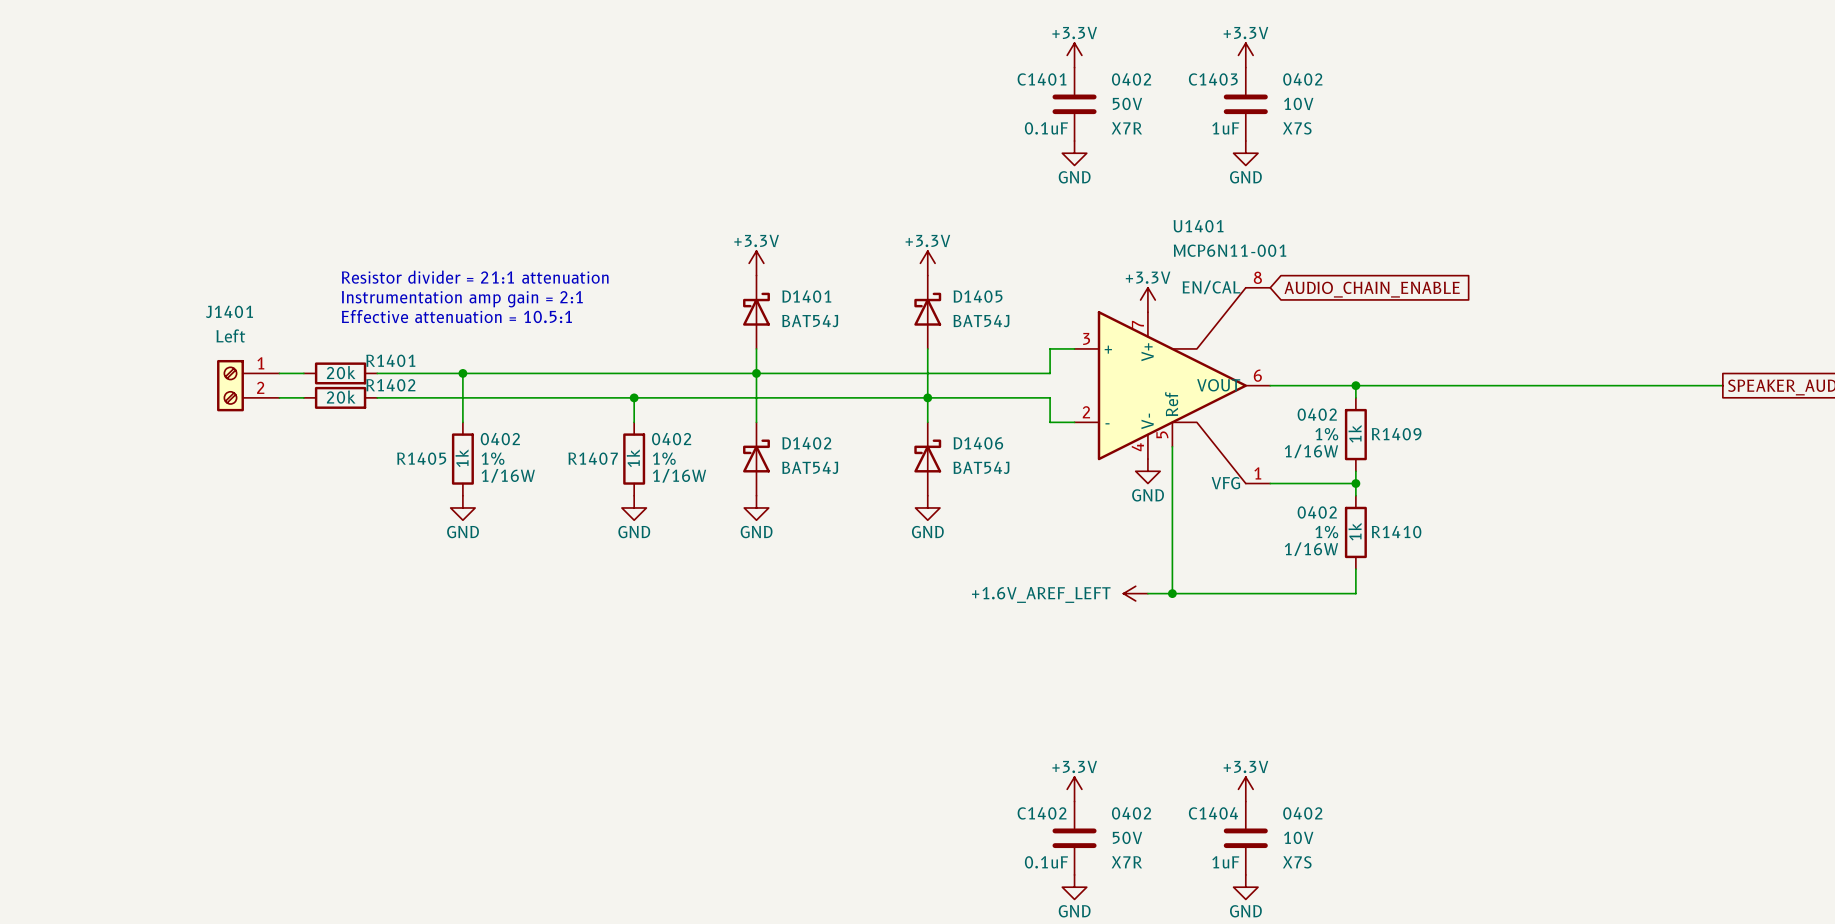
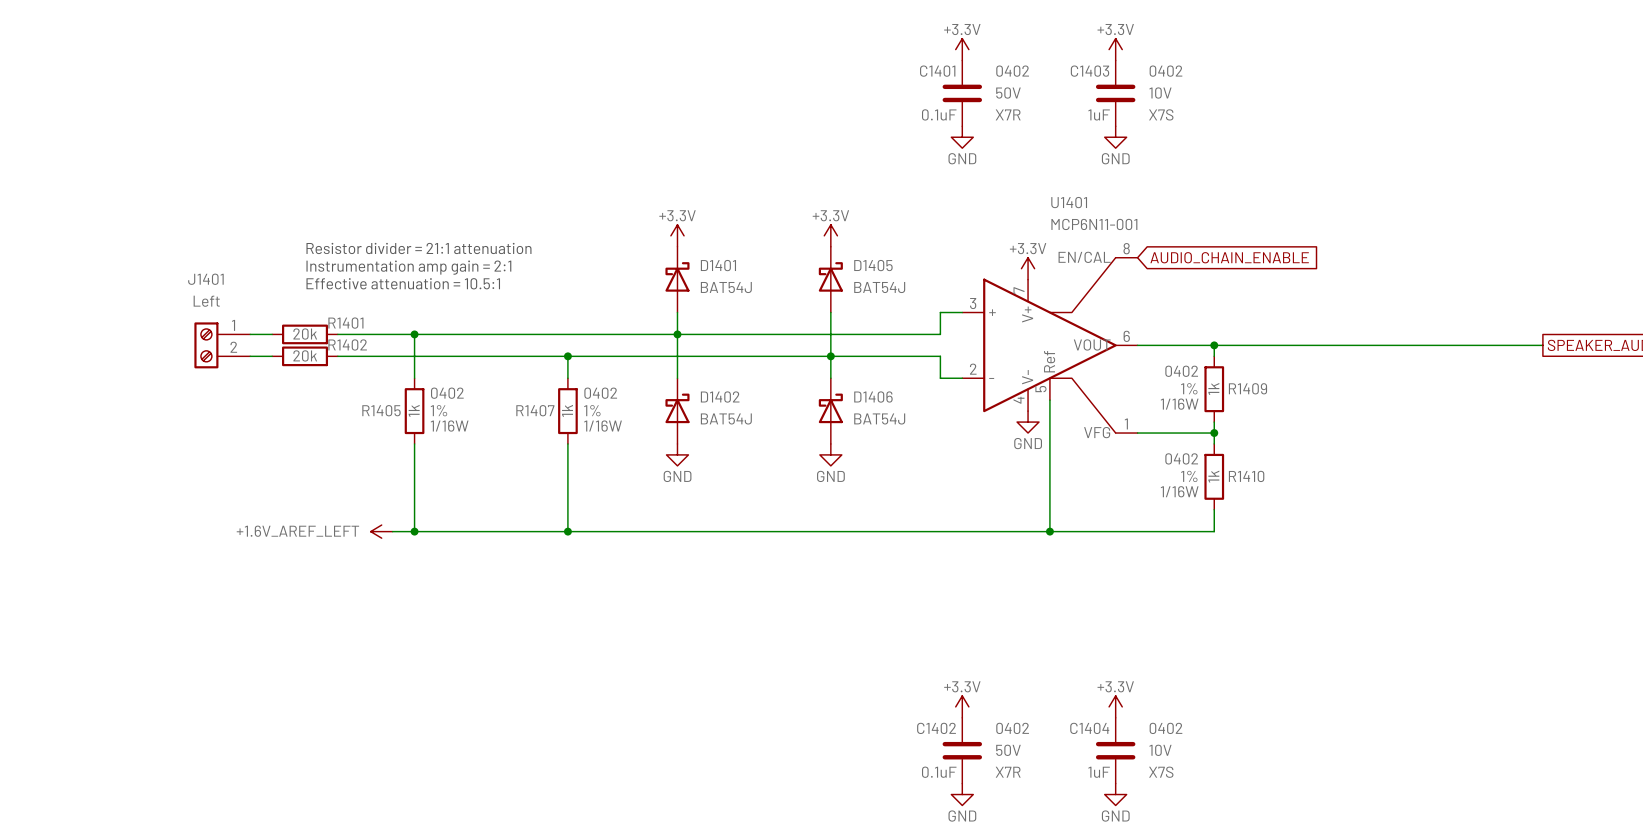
wire: none -> (414, 443) (414, 531)
wire: none -> (567, 443) (567, 531)
power symbol: GND (462, 507) -> none
power symbol: GND (634, 507) -> none
power symbol: none -> +1.6V_AREF_LEFT (381, 531)
wire: none -> (392, 531) (1028, 531)
junction: none -> (414, 531)
junction: none -> (567, 531)
power symbol: +1.6V_AREF_LEFT (1135, 593) -> none

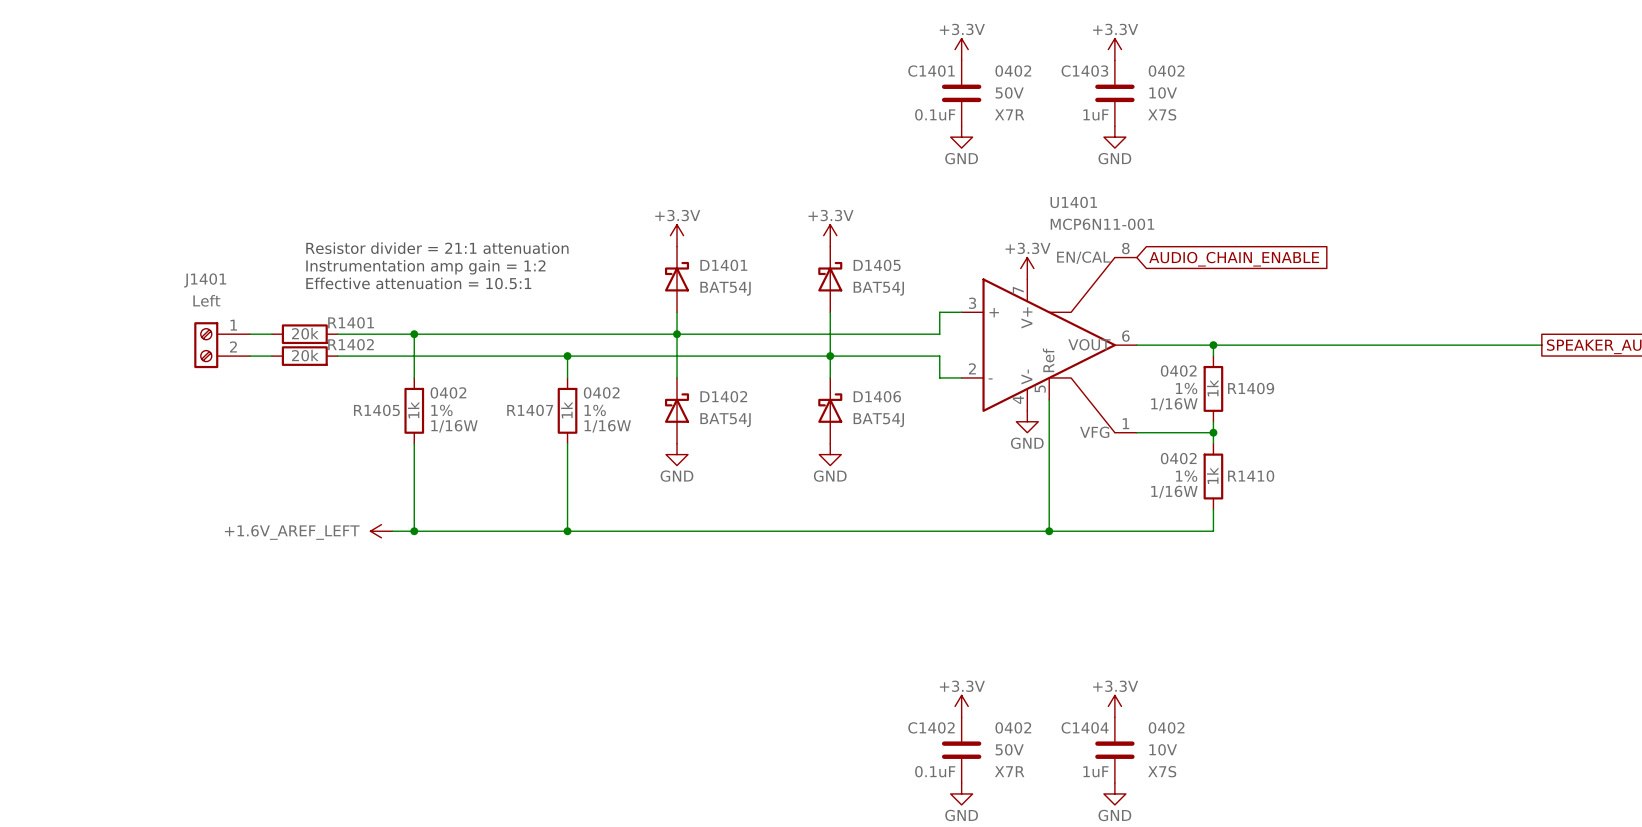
text: Instrumentation amp gain = 2:1 (408, 267) -> Instrumentation amp gain = 1:2 (425, 267)

